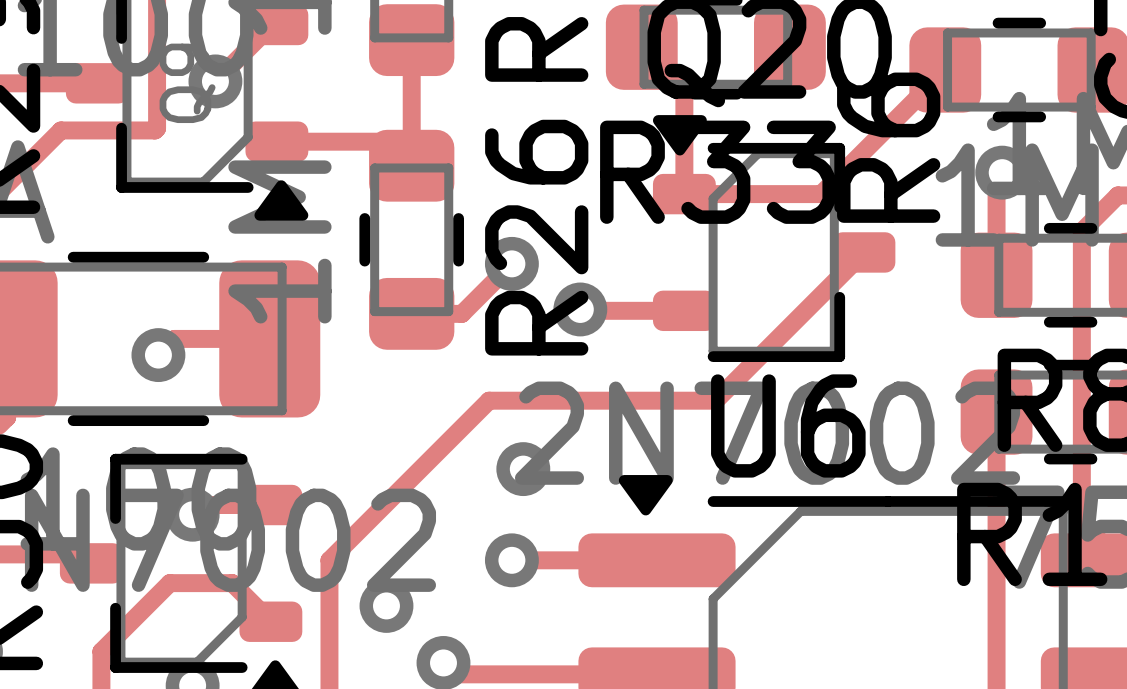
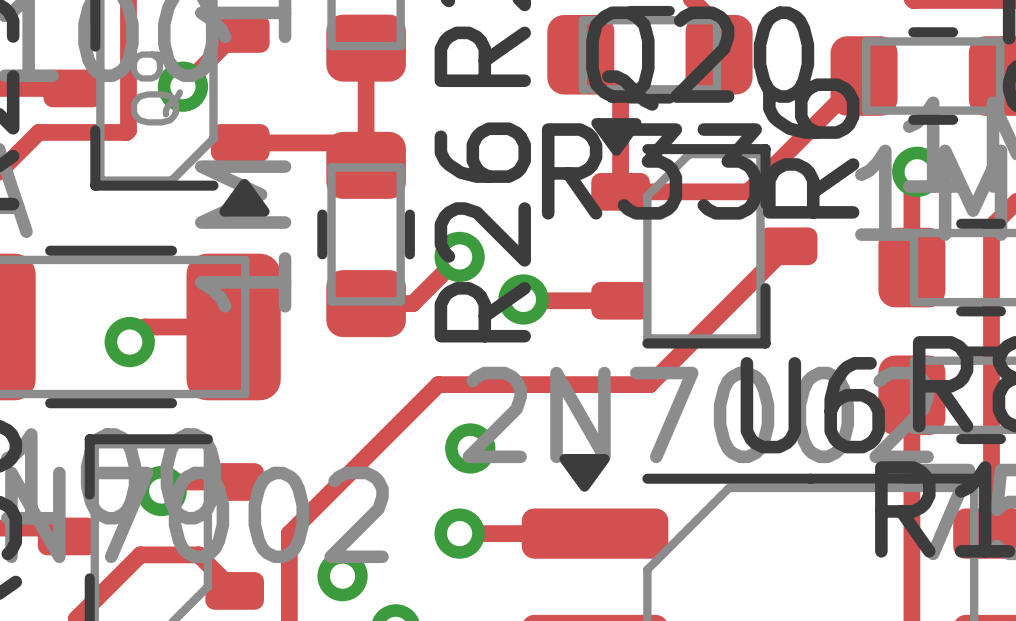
U6 name position: U6 (788, 425) -> U6 (812, 405)

